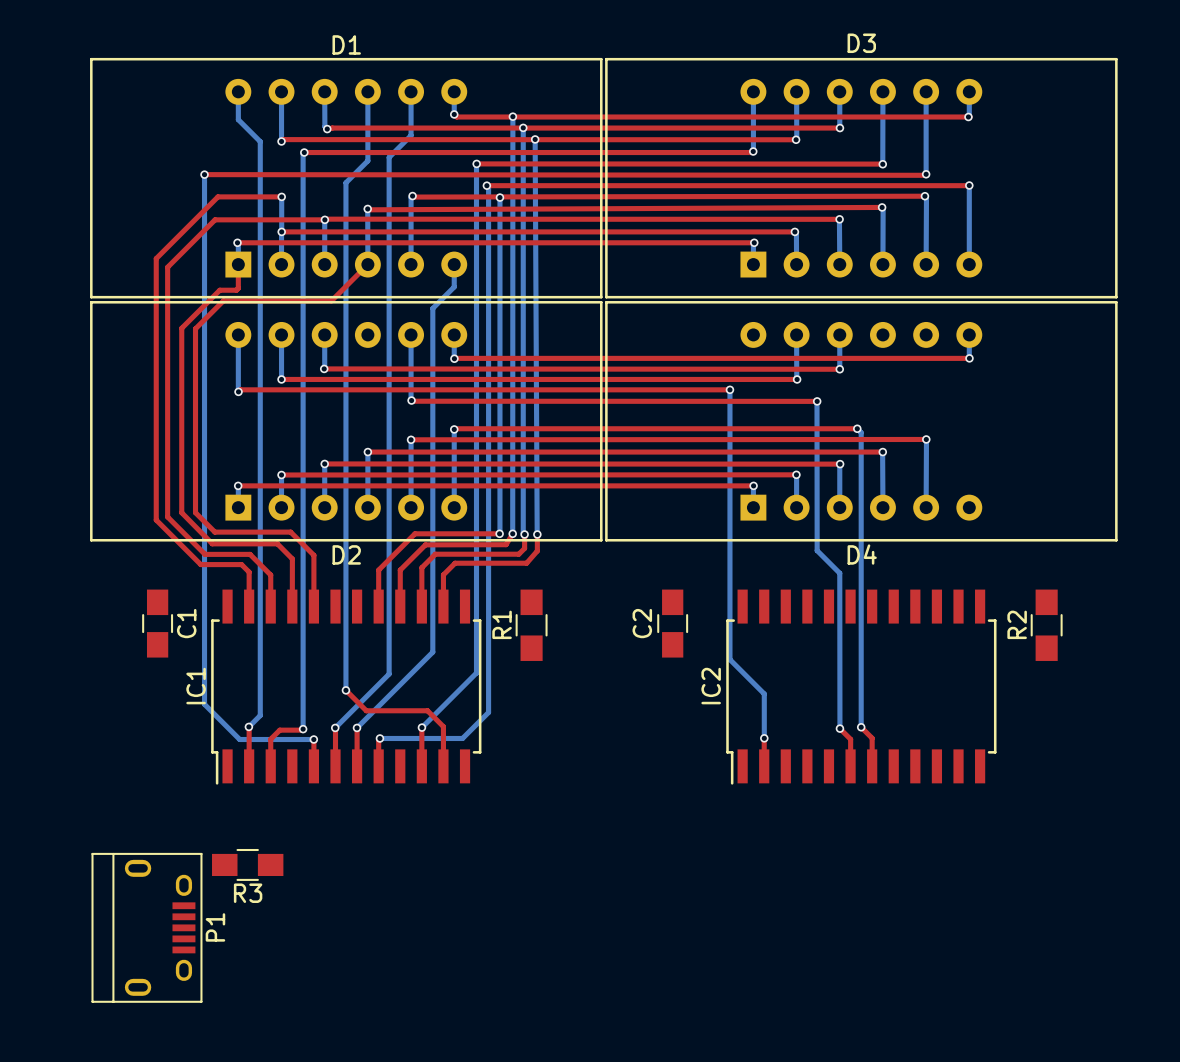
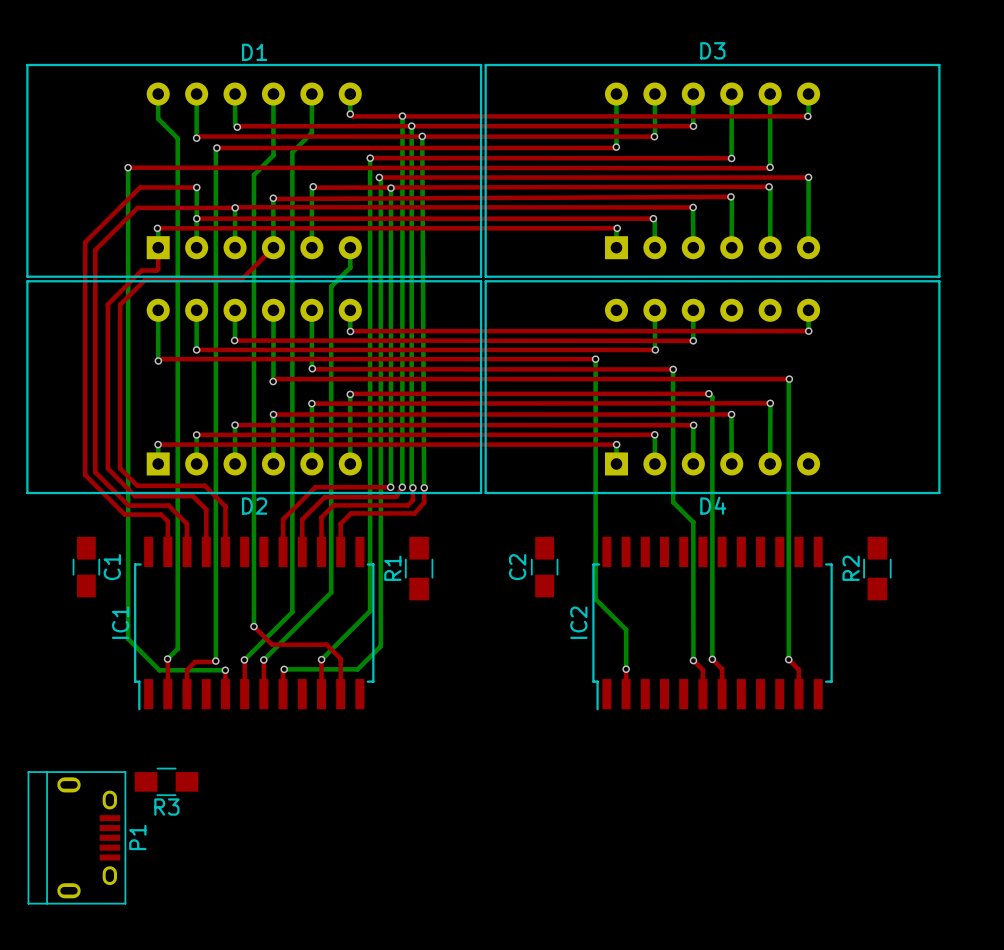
bottom track: none -> (273, 310) (273, 381)
top track: none -> (789, 379) (275, 379) (273, 381)
bottom track: none -> (789, 379) (788, 659)
via: none -> (789, 379)
via: none -> (273, 381)
top track: none -> (788, 659) (798, 669) (798, 694)
via: none -> (788, 659)

